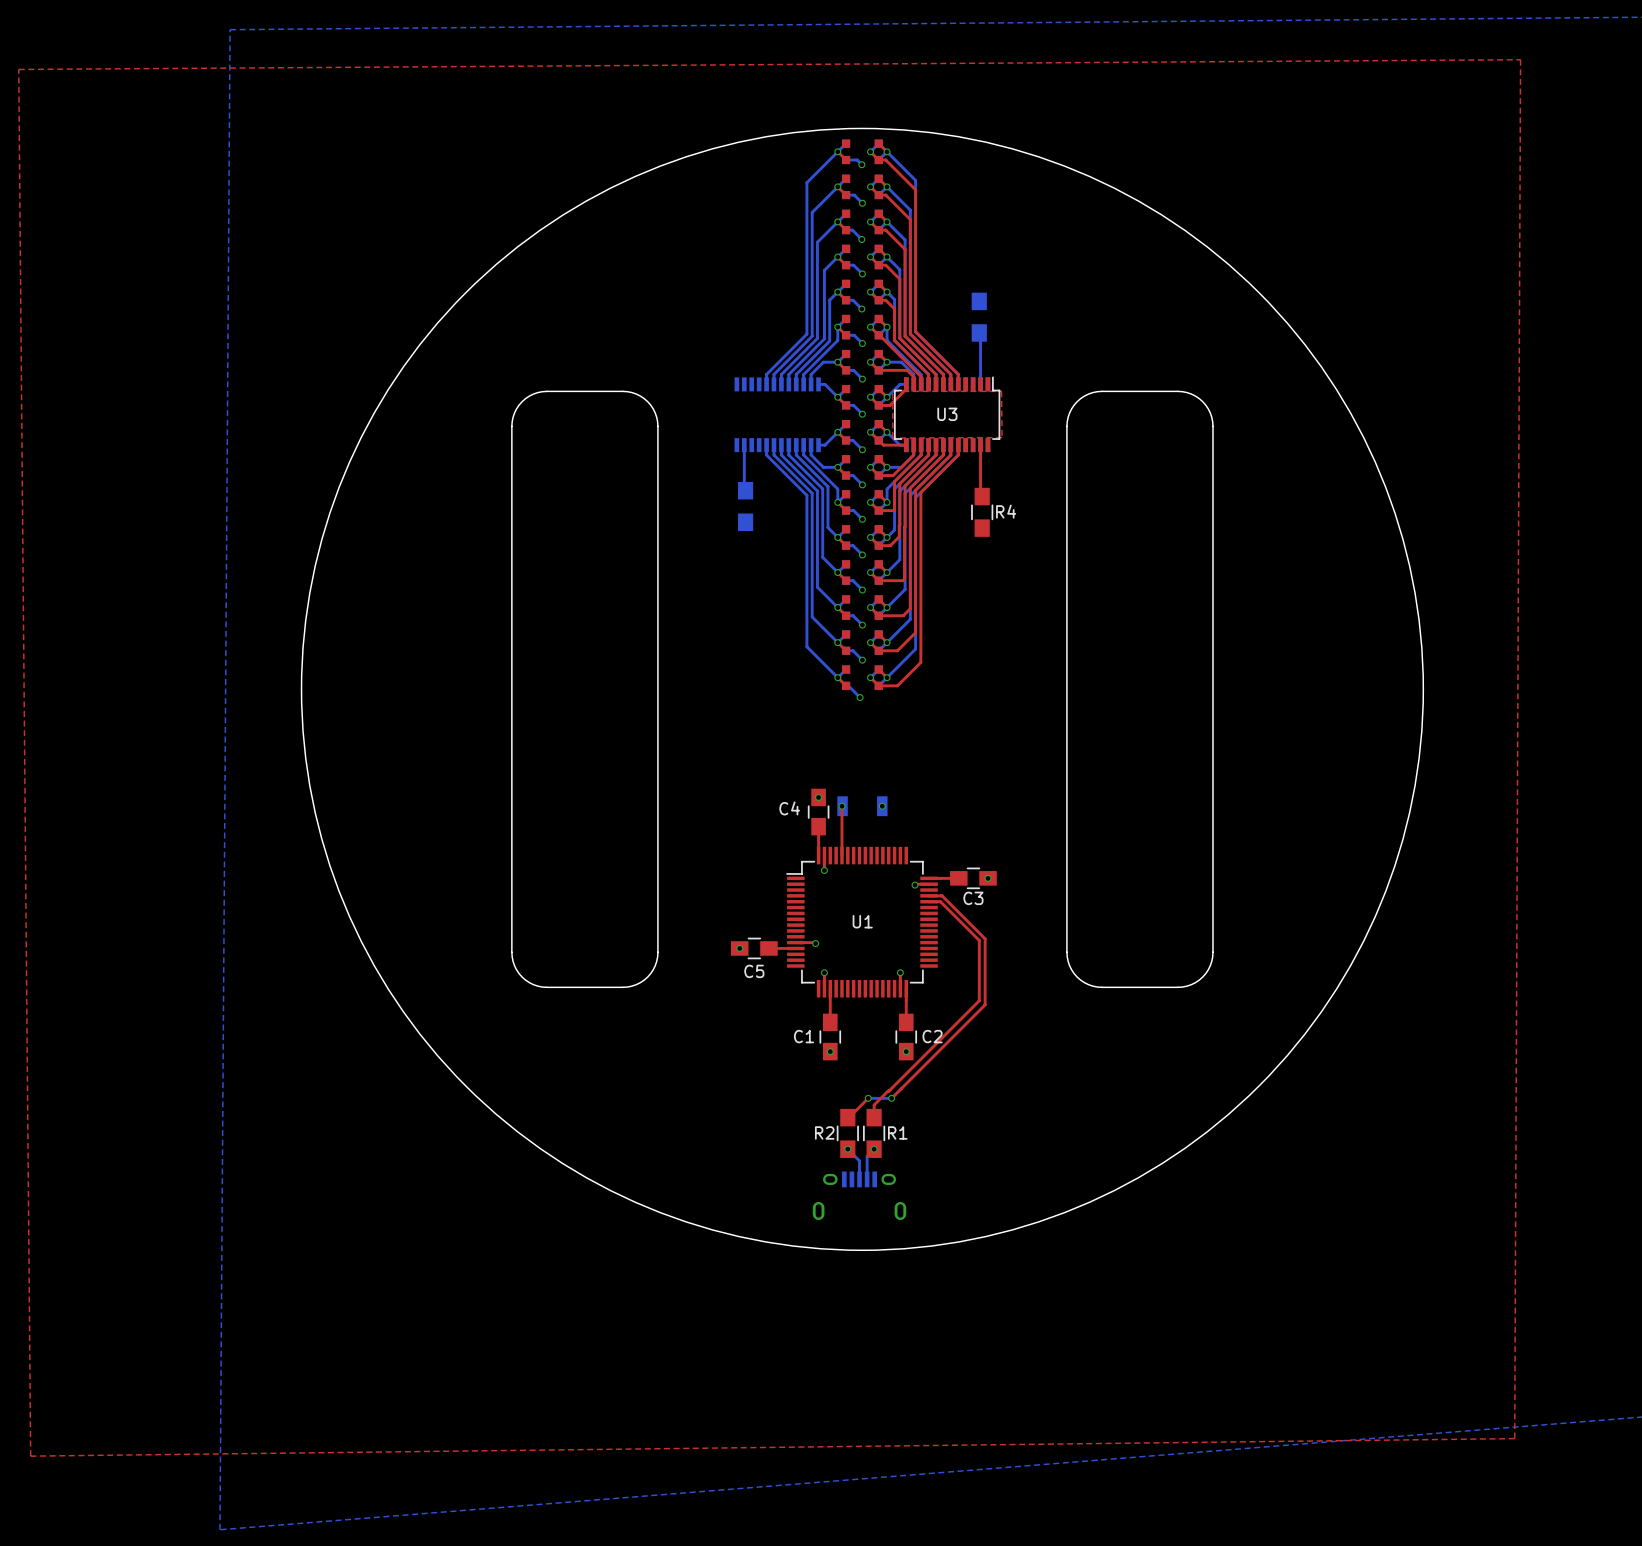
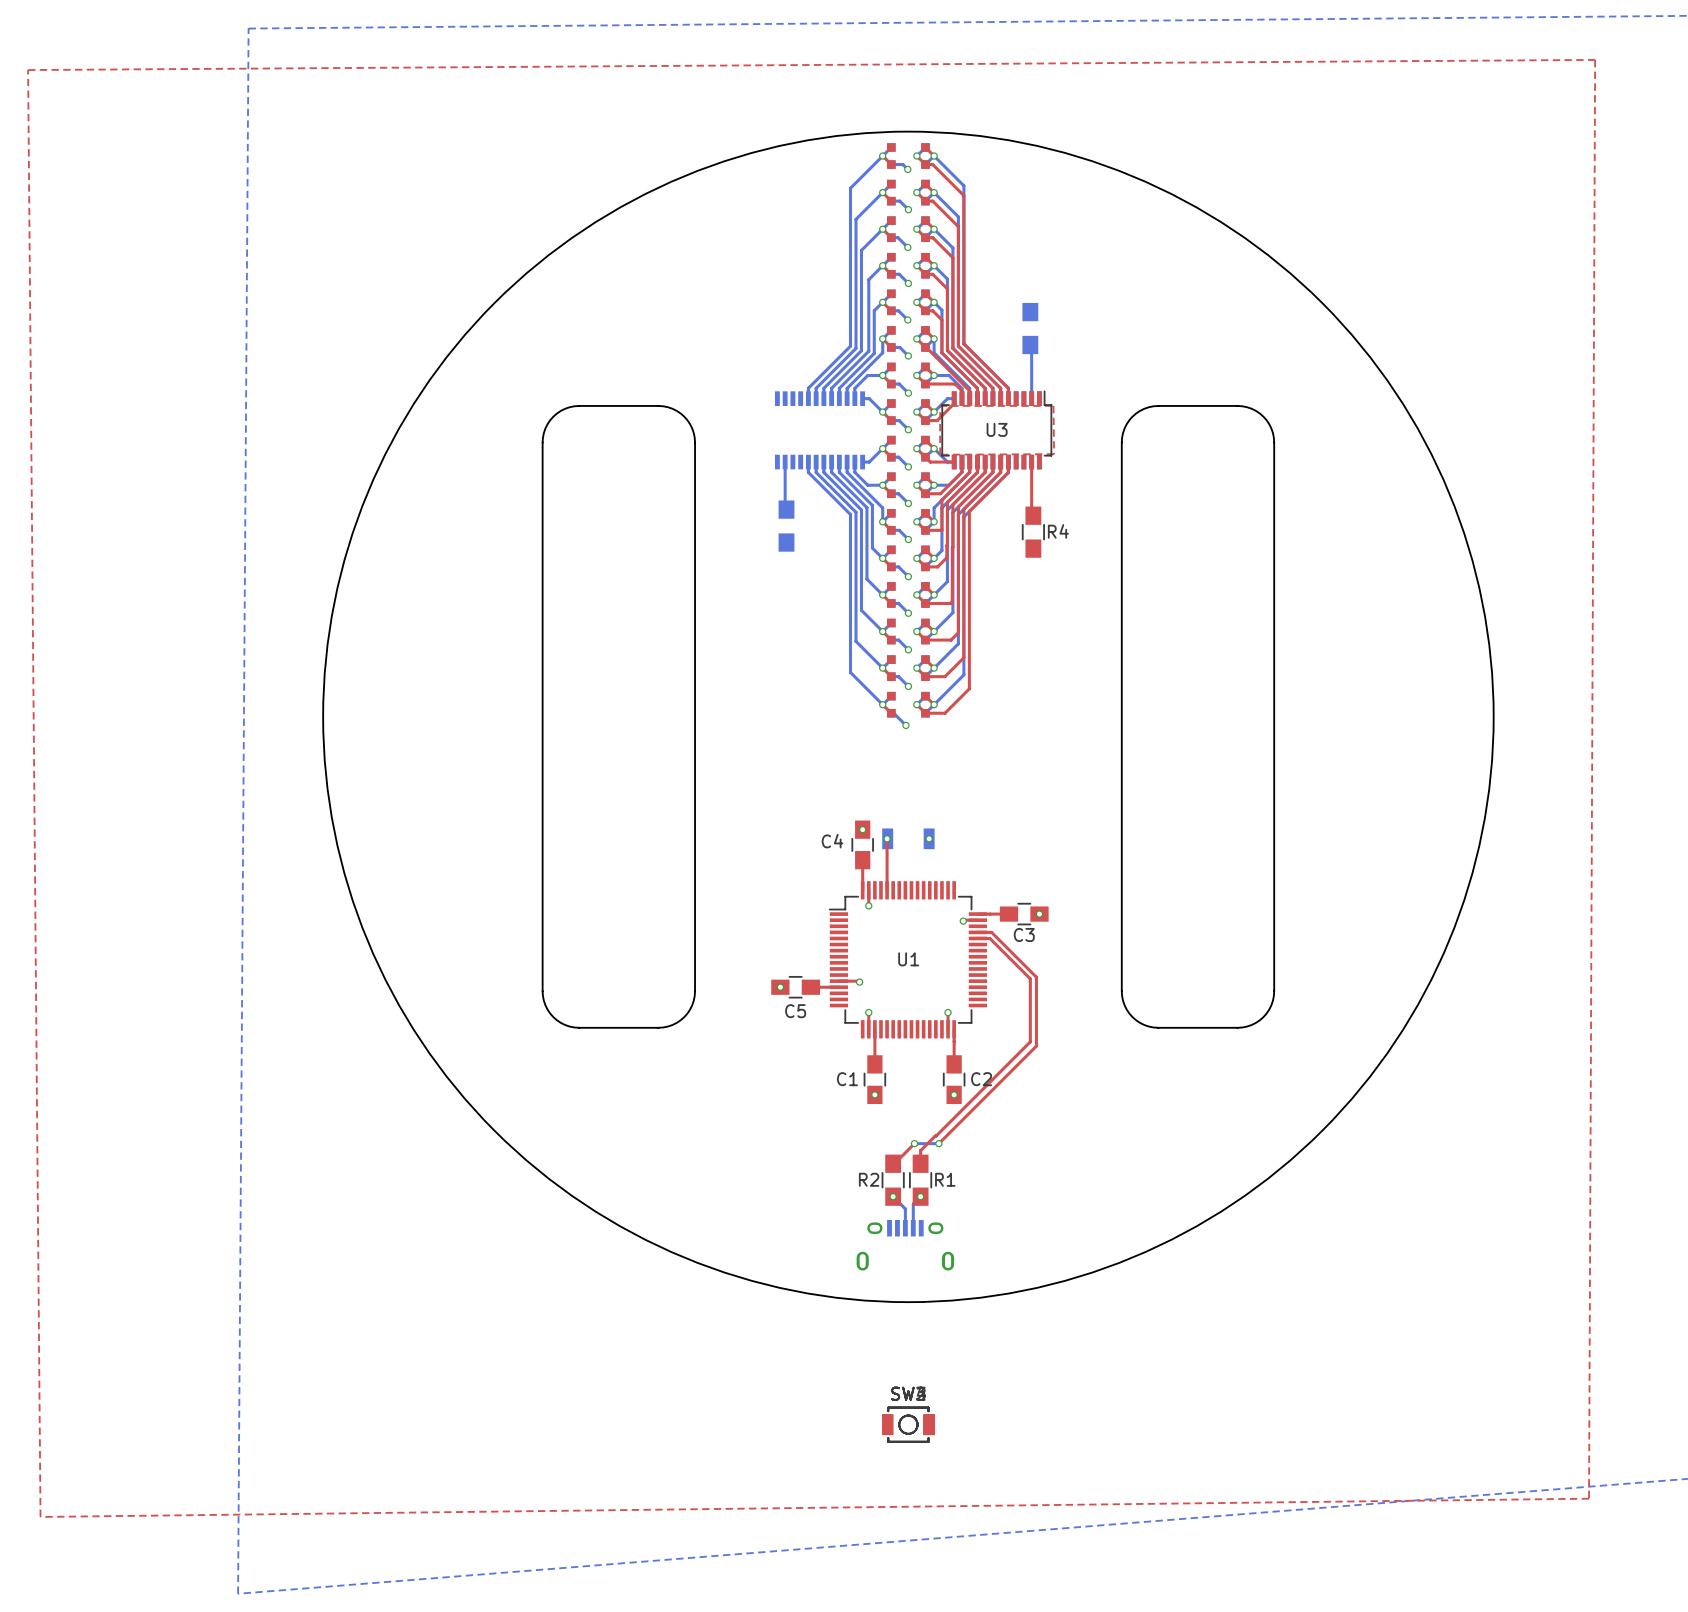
part: none -> (908, 1424)
part: none -> (908, 1424)
part: none -> (908, 1424)

